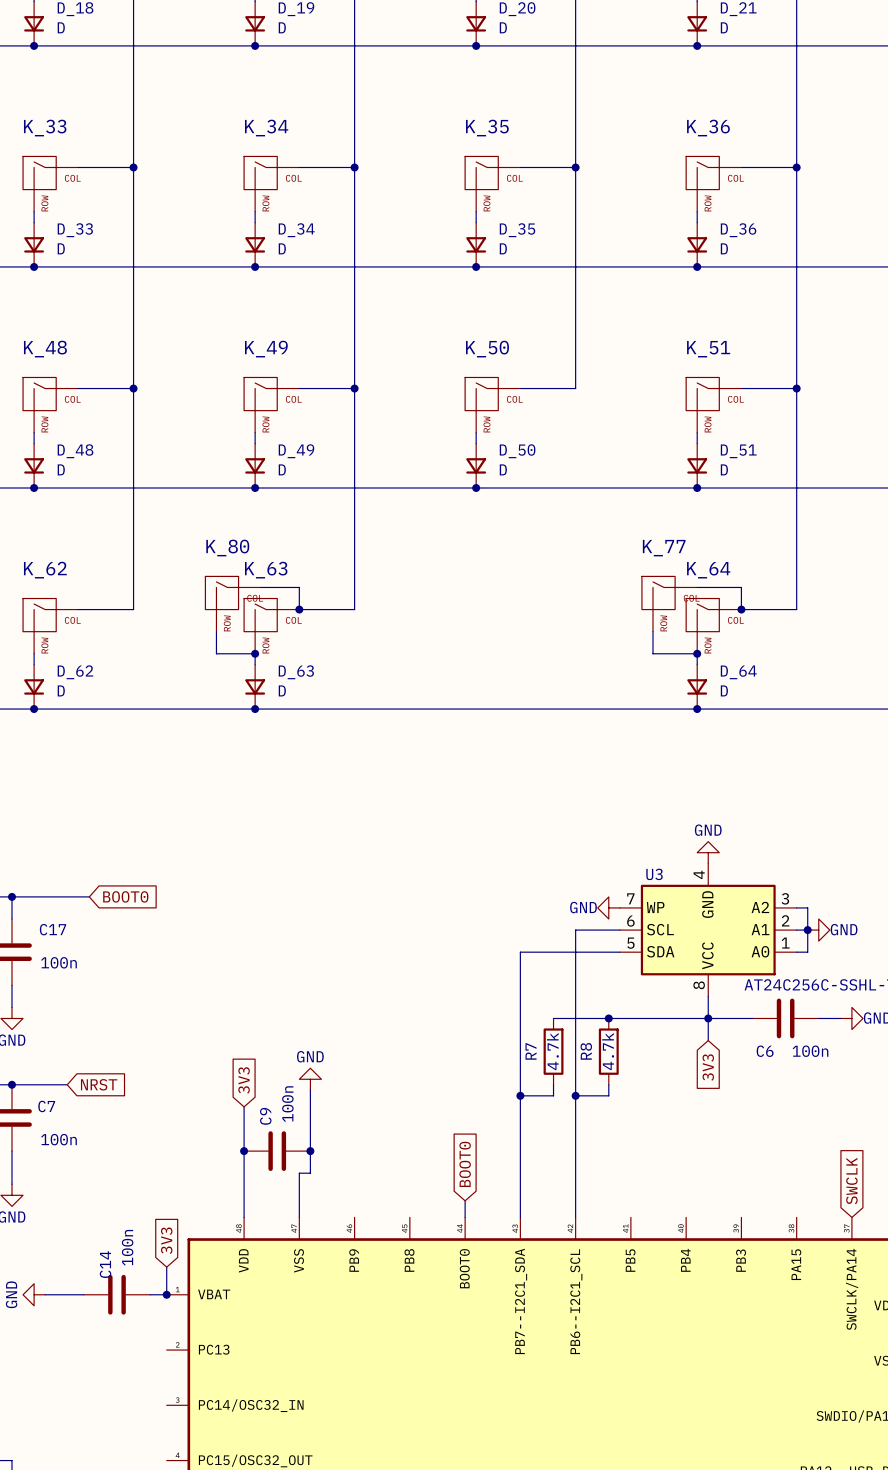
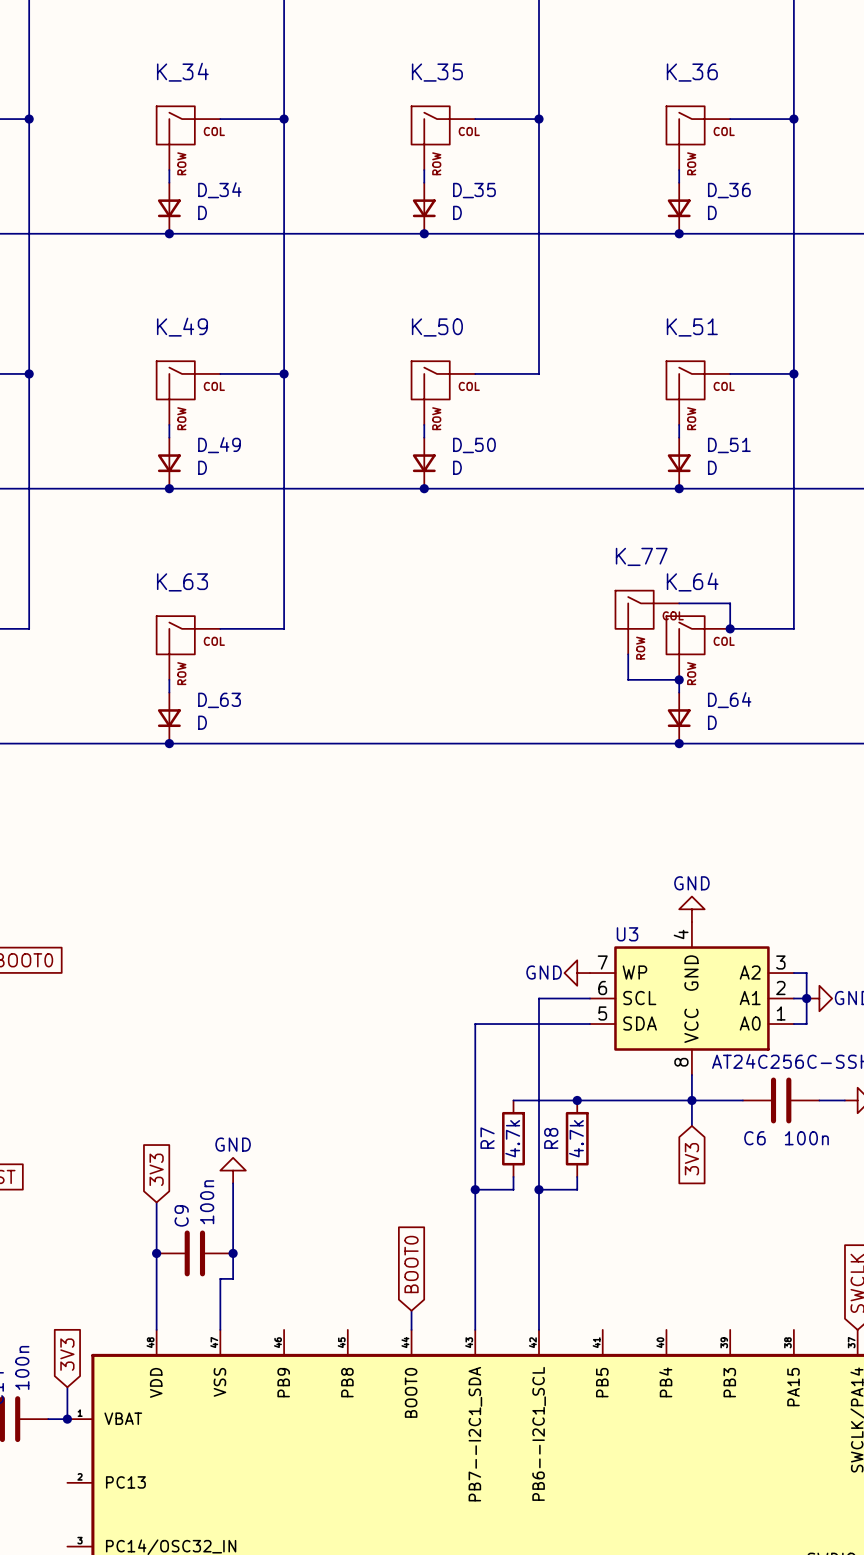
wire: (260, 587) (299, 587) (299, 609) -> none
K_80: (233, 604) -> none
junction: (299, 609) -> none
wire: (216, 631) (216, 653) (255, 653) -> none
junction: (255, 653) -> none

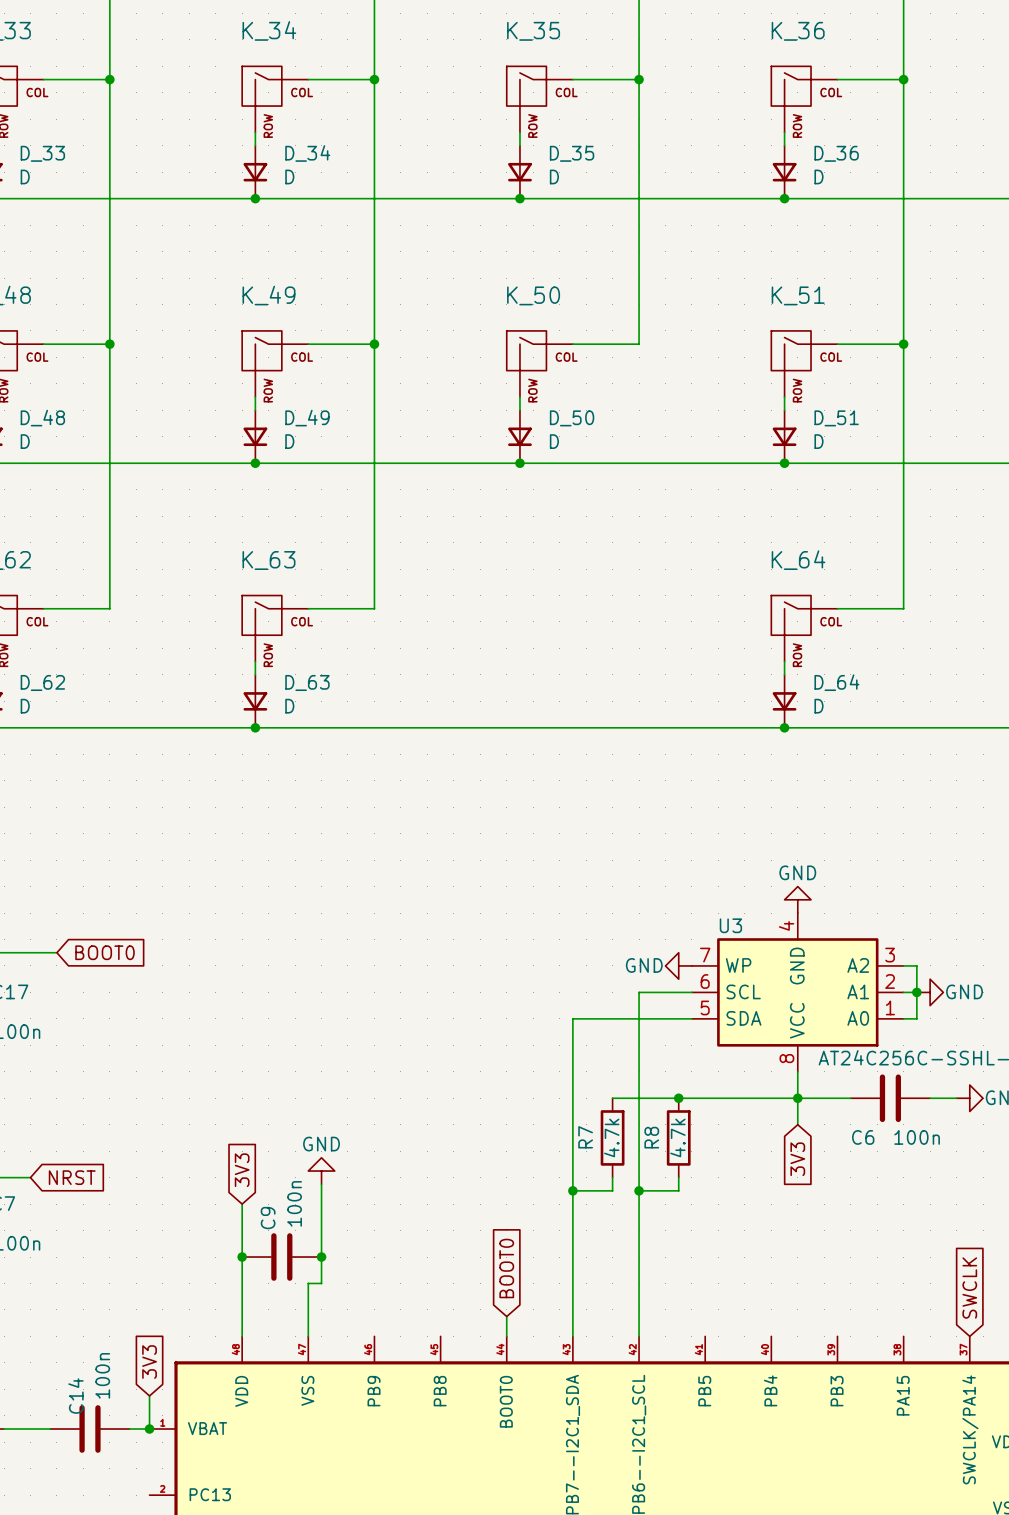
wire: (679, 603) (730, 603) (730, 628) -> none
K_77: (647, 622) -> none
junction: (730, 628) -> none
wire: (628, 654) (628, 679) (679, 679) -> none
junction: (679, 679) -> none

